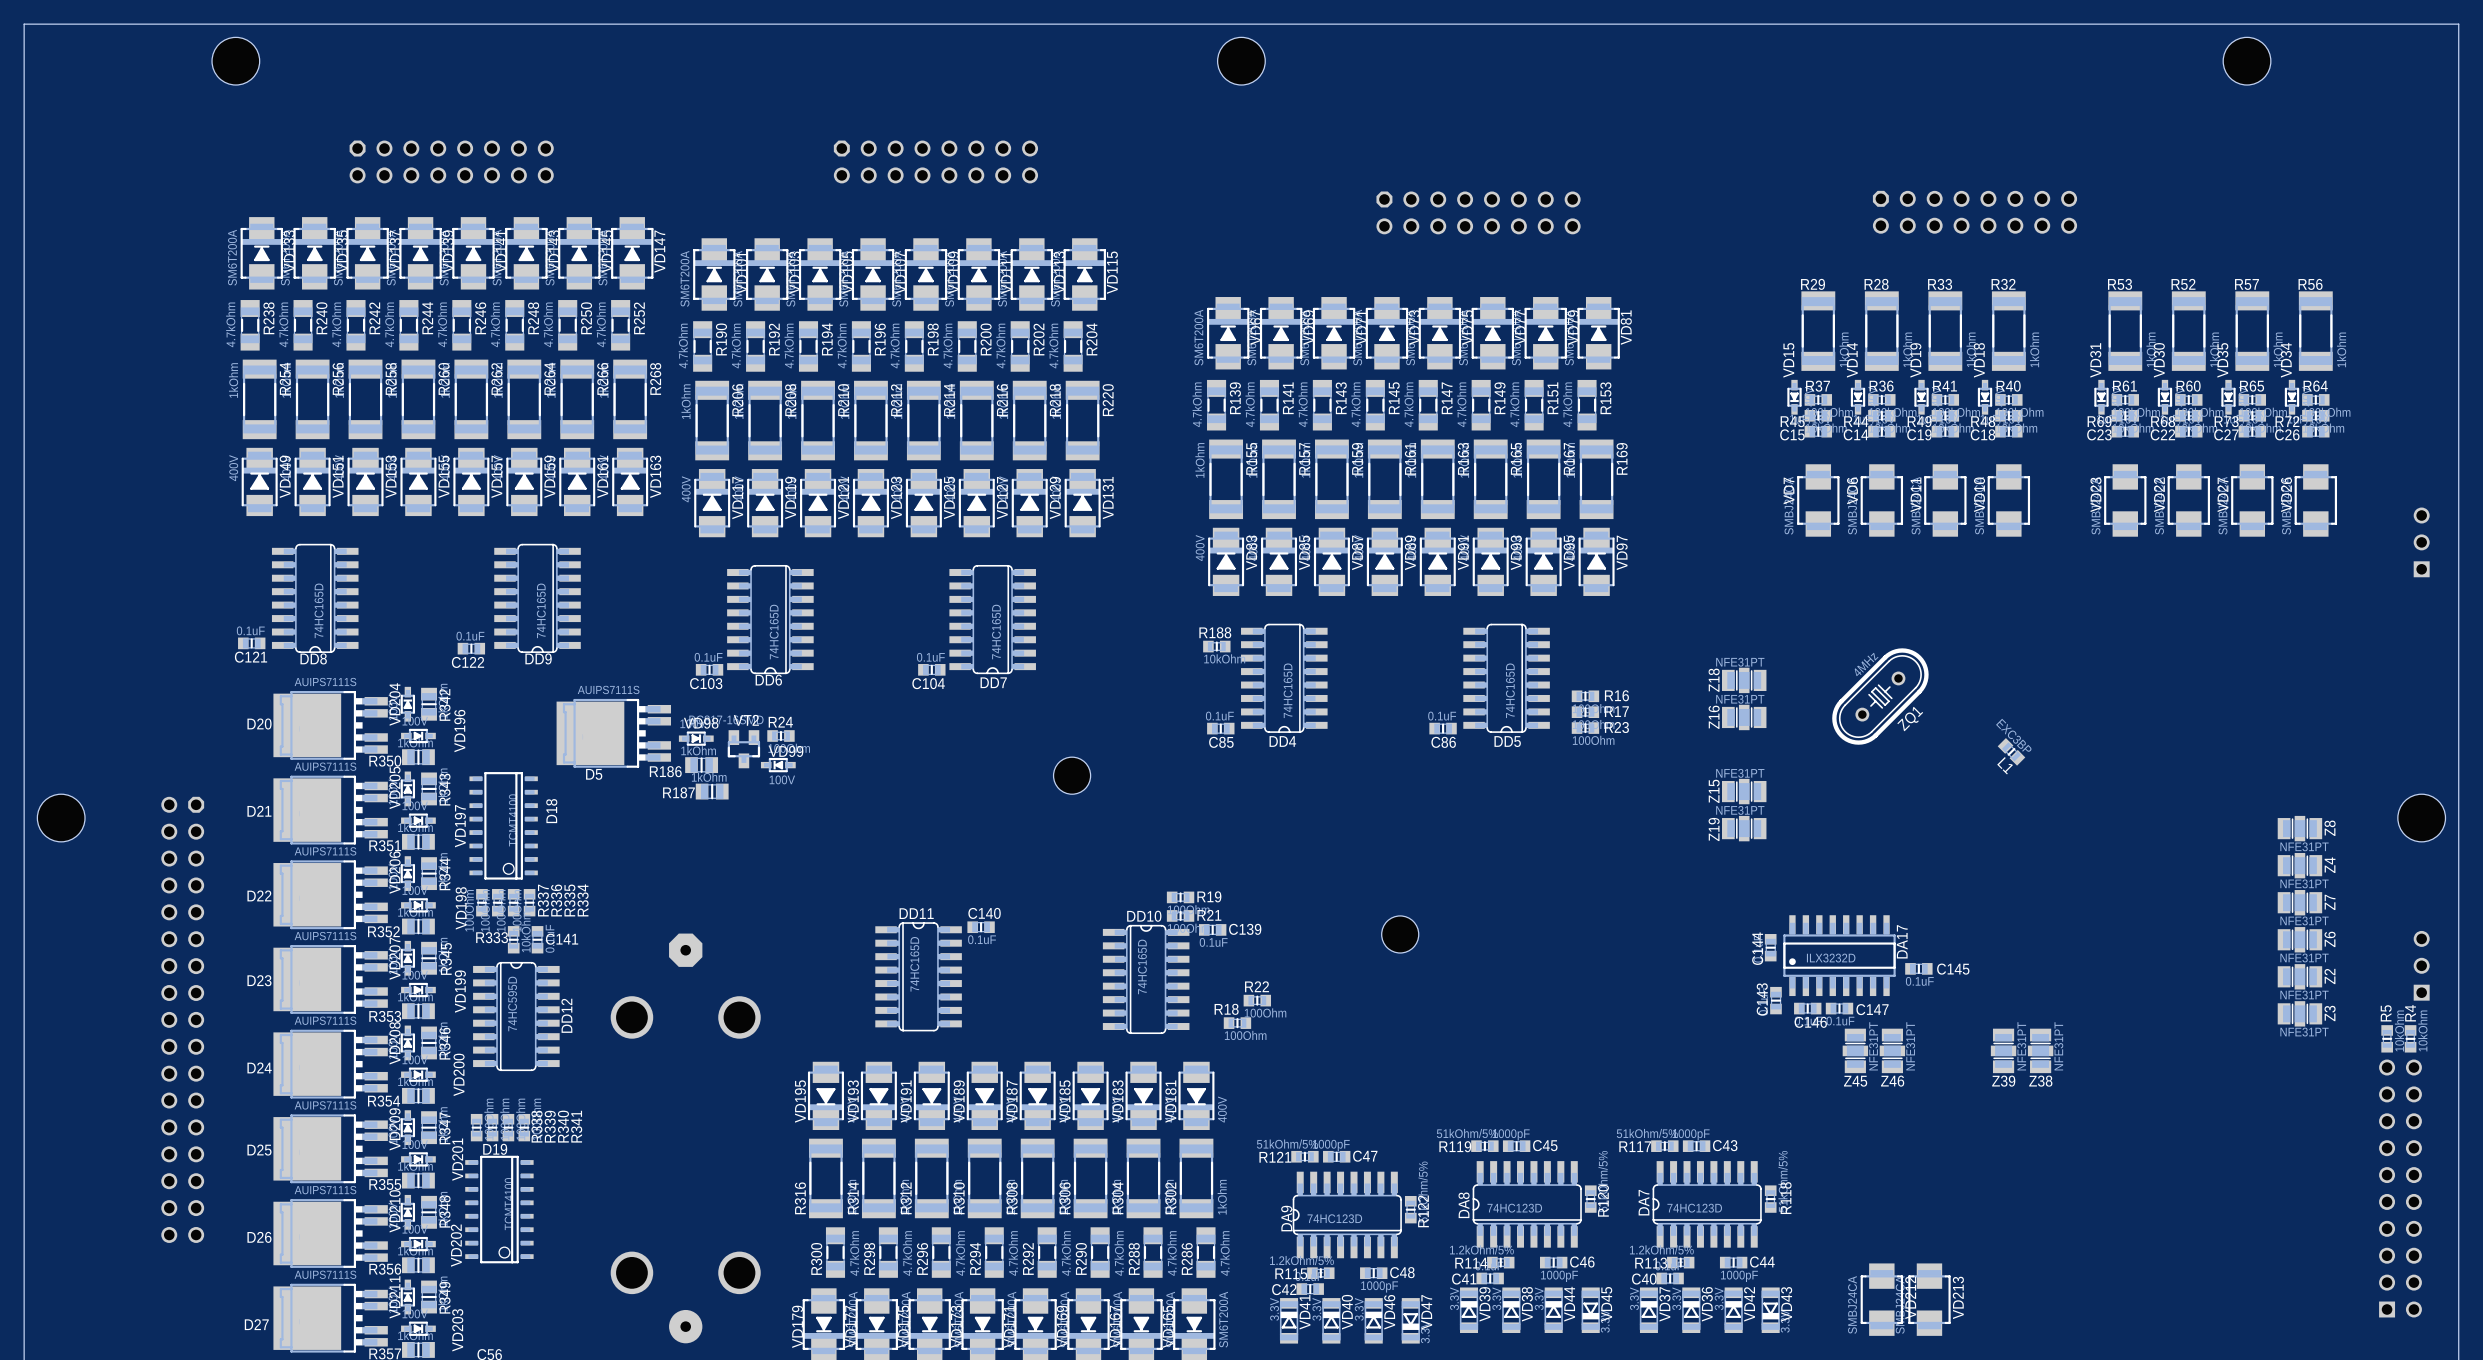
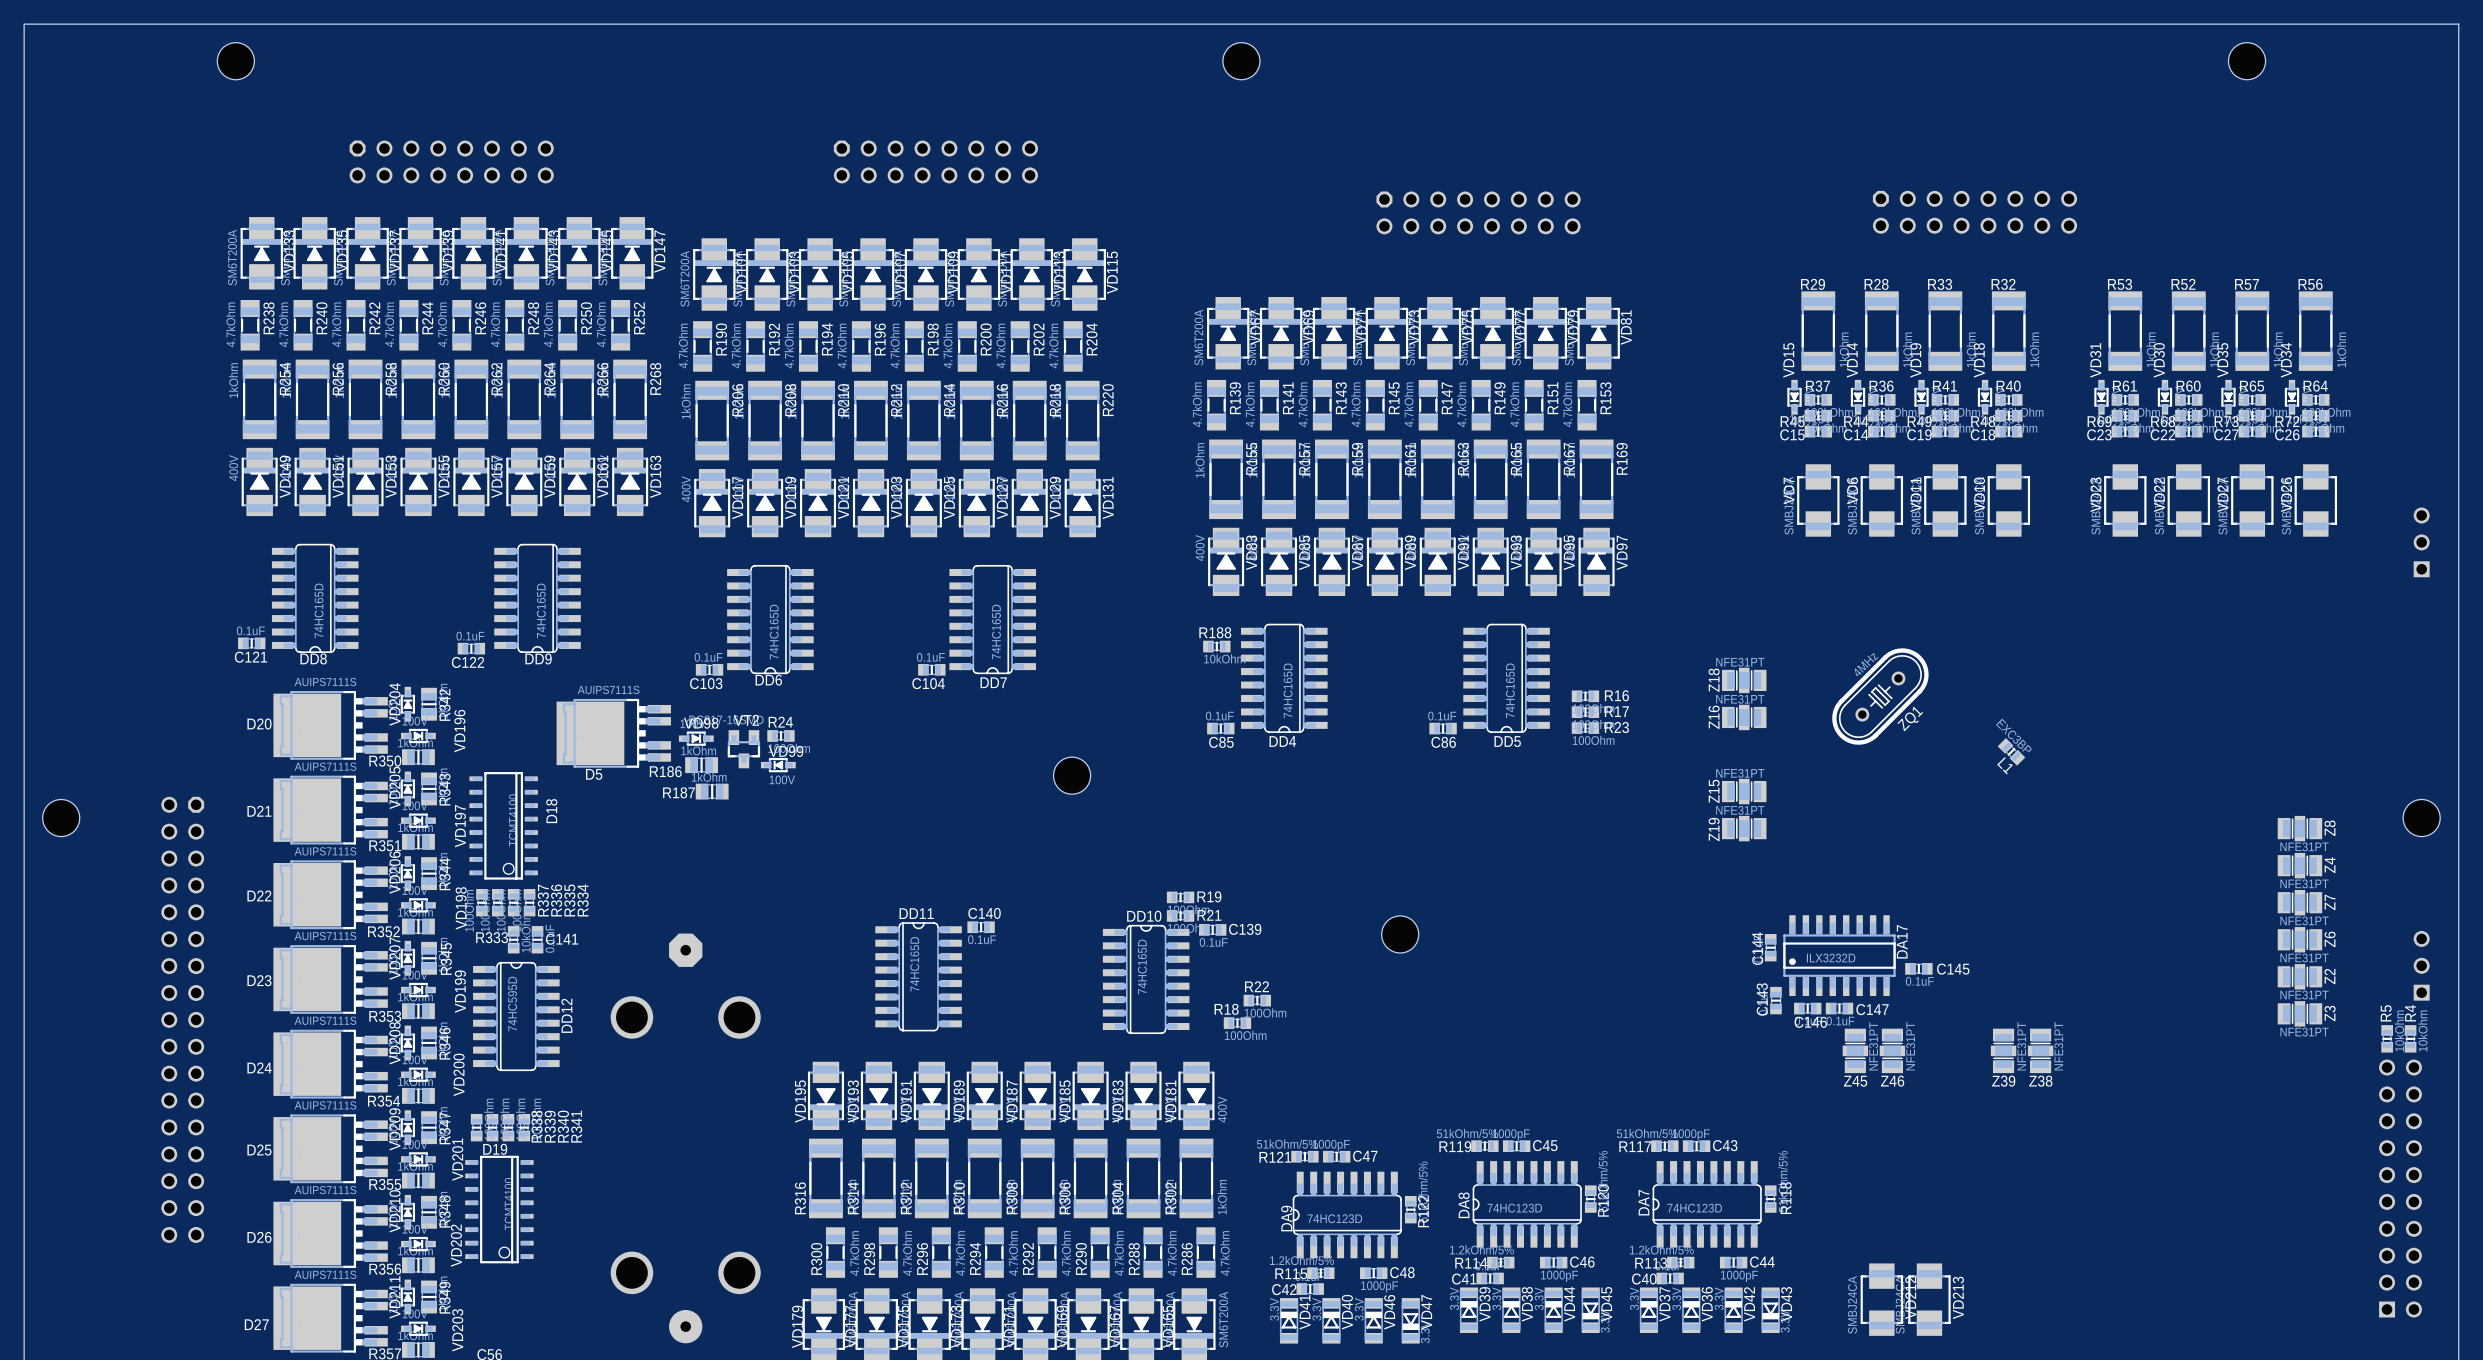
part footprint: [212, 37, 260, 86] -> [217, 42, 255, 80]
part footprint: [1217, 37, 1266, 86] -> [1222, 42, 1260, 80]
part footprint: [2223, 37, 2271, 86] -> [2228, 42, 2266, 80]
part footprint: [37, 794, 86, 842] -> [42, 799, 80, 837]
part footprint: [2397, 794, 2446, 842] -> [2403, 799, 2441, 837]

